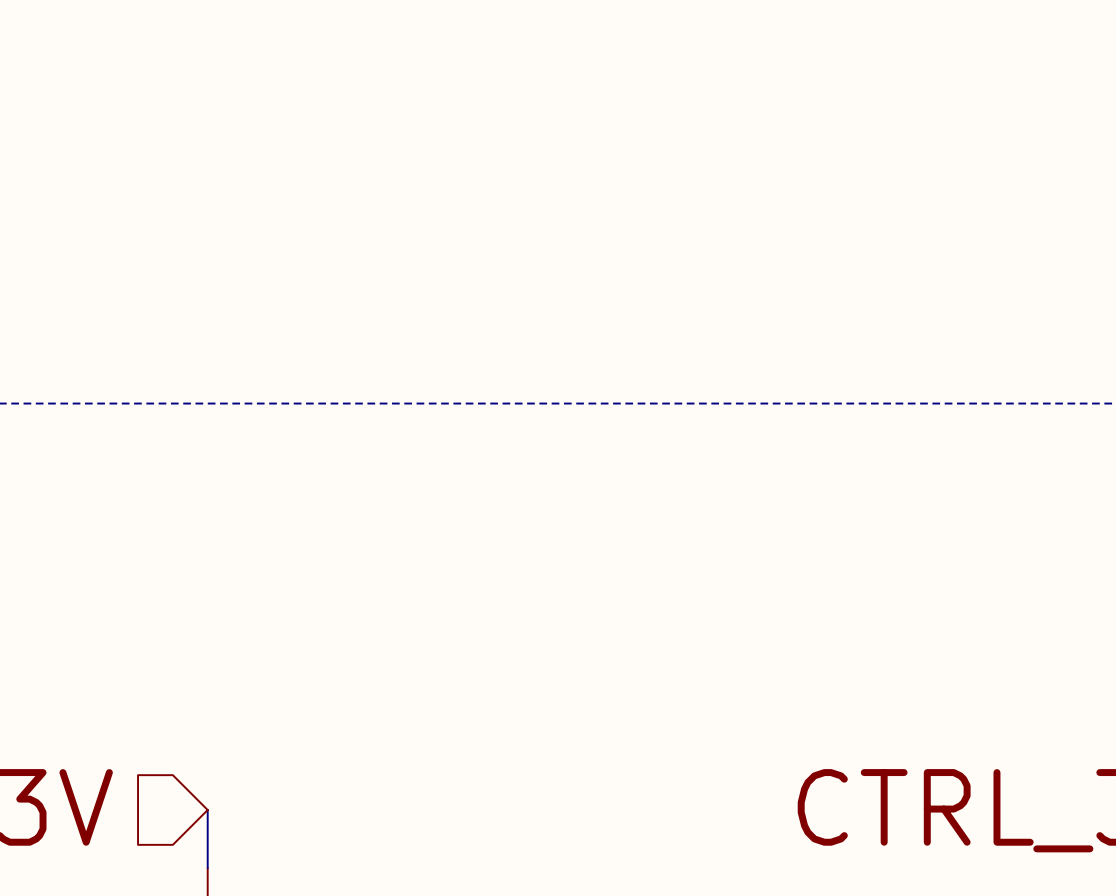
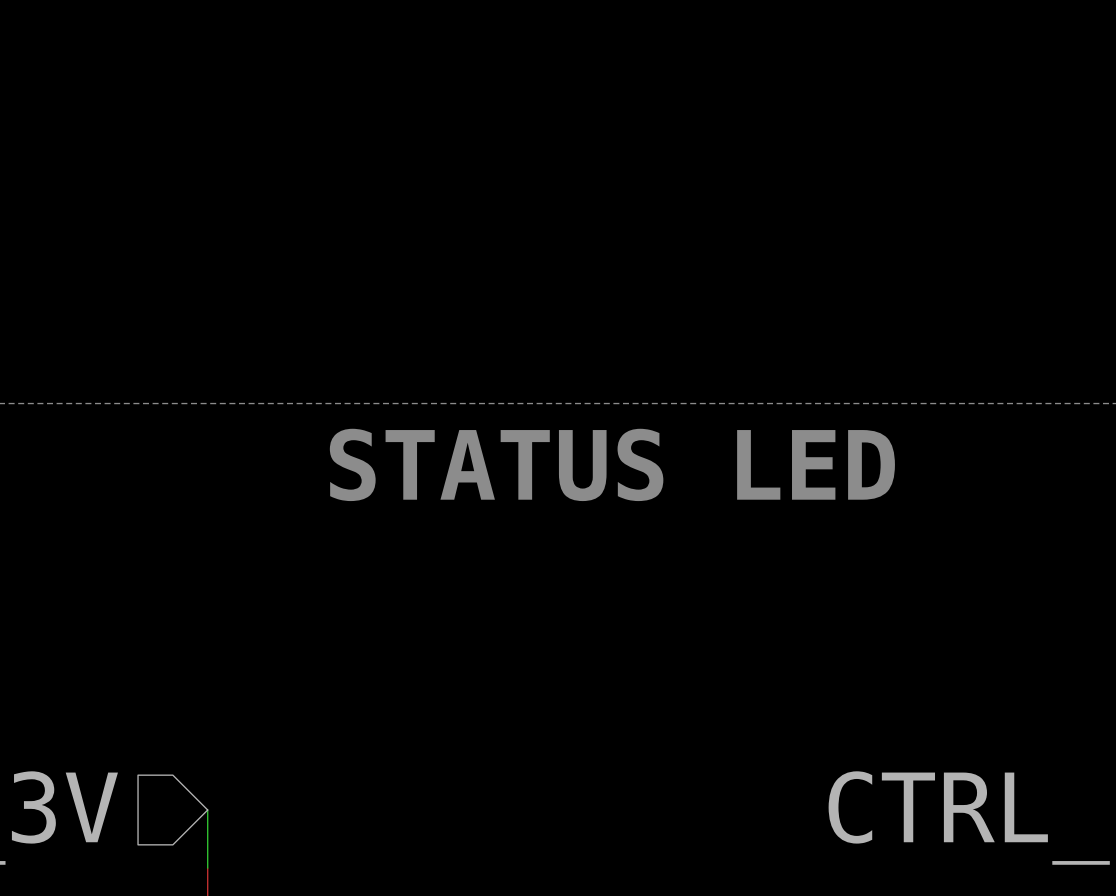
text: none -> STATUS LED (612, 464)

